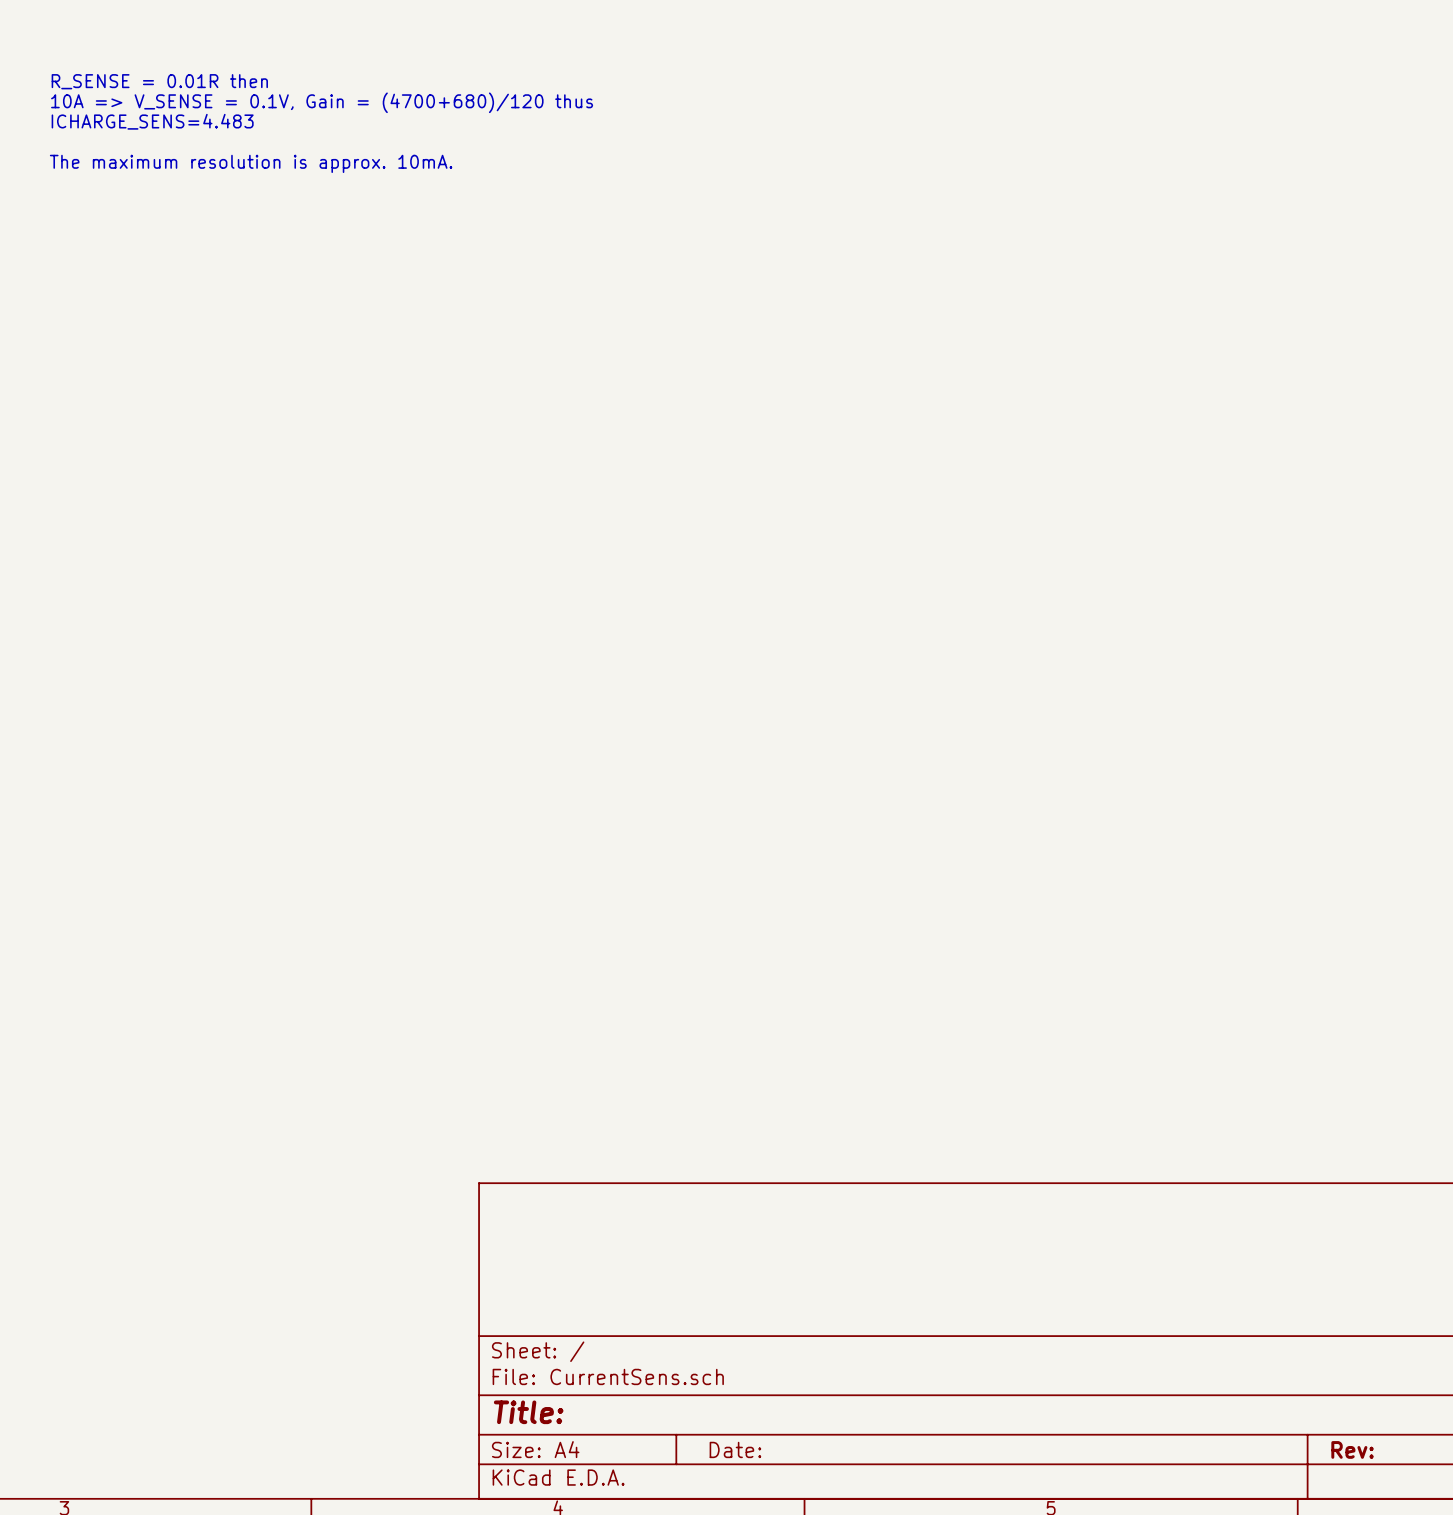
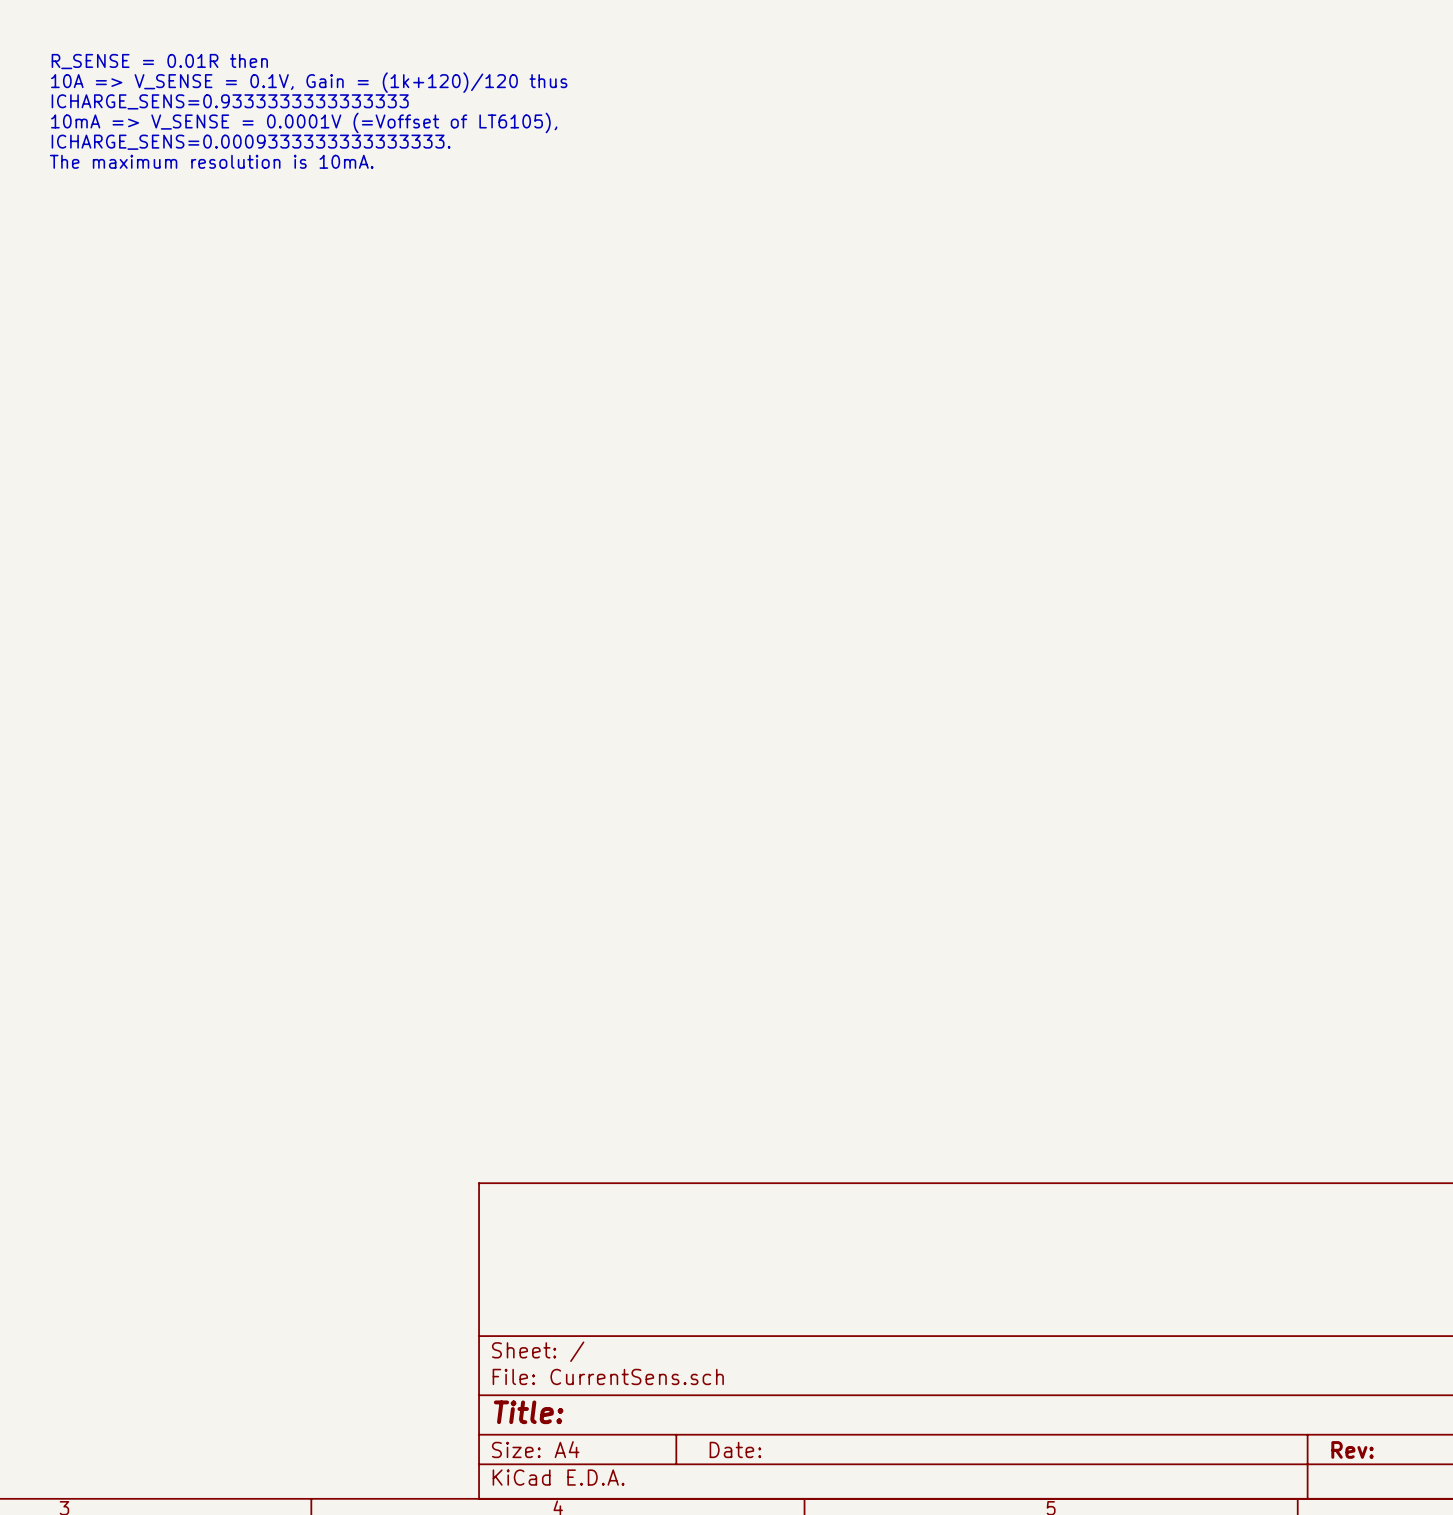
text: none -> R_SENSE = 0.01R then (159, 61)
text: R_SENSE = 0.01R then (159, 81) -> 10A => V_SENSE = 0.1V, Gain = (1k+120)/120 thus (309, 82)
text: 10A => V_SENSE = 0.1V, Gain = (4700+680)/120 thus (322, 102) -> ICHARGE_SENS=0.9333333333333333 (230, 101)
text: ICHARGE_SENS=4.483 (152, 121) -> 10mA => V_SENSE = 0.0001V (=Voffset of LT6105), (304, 122)
text: none -> ICHARGE_SENS=0.0009333333333333333. (251, 142)
text: The maximum resolution is approx. 10mA. (251, 163) -> The maximum resolution is 10mA. (211, 161)

